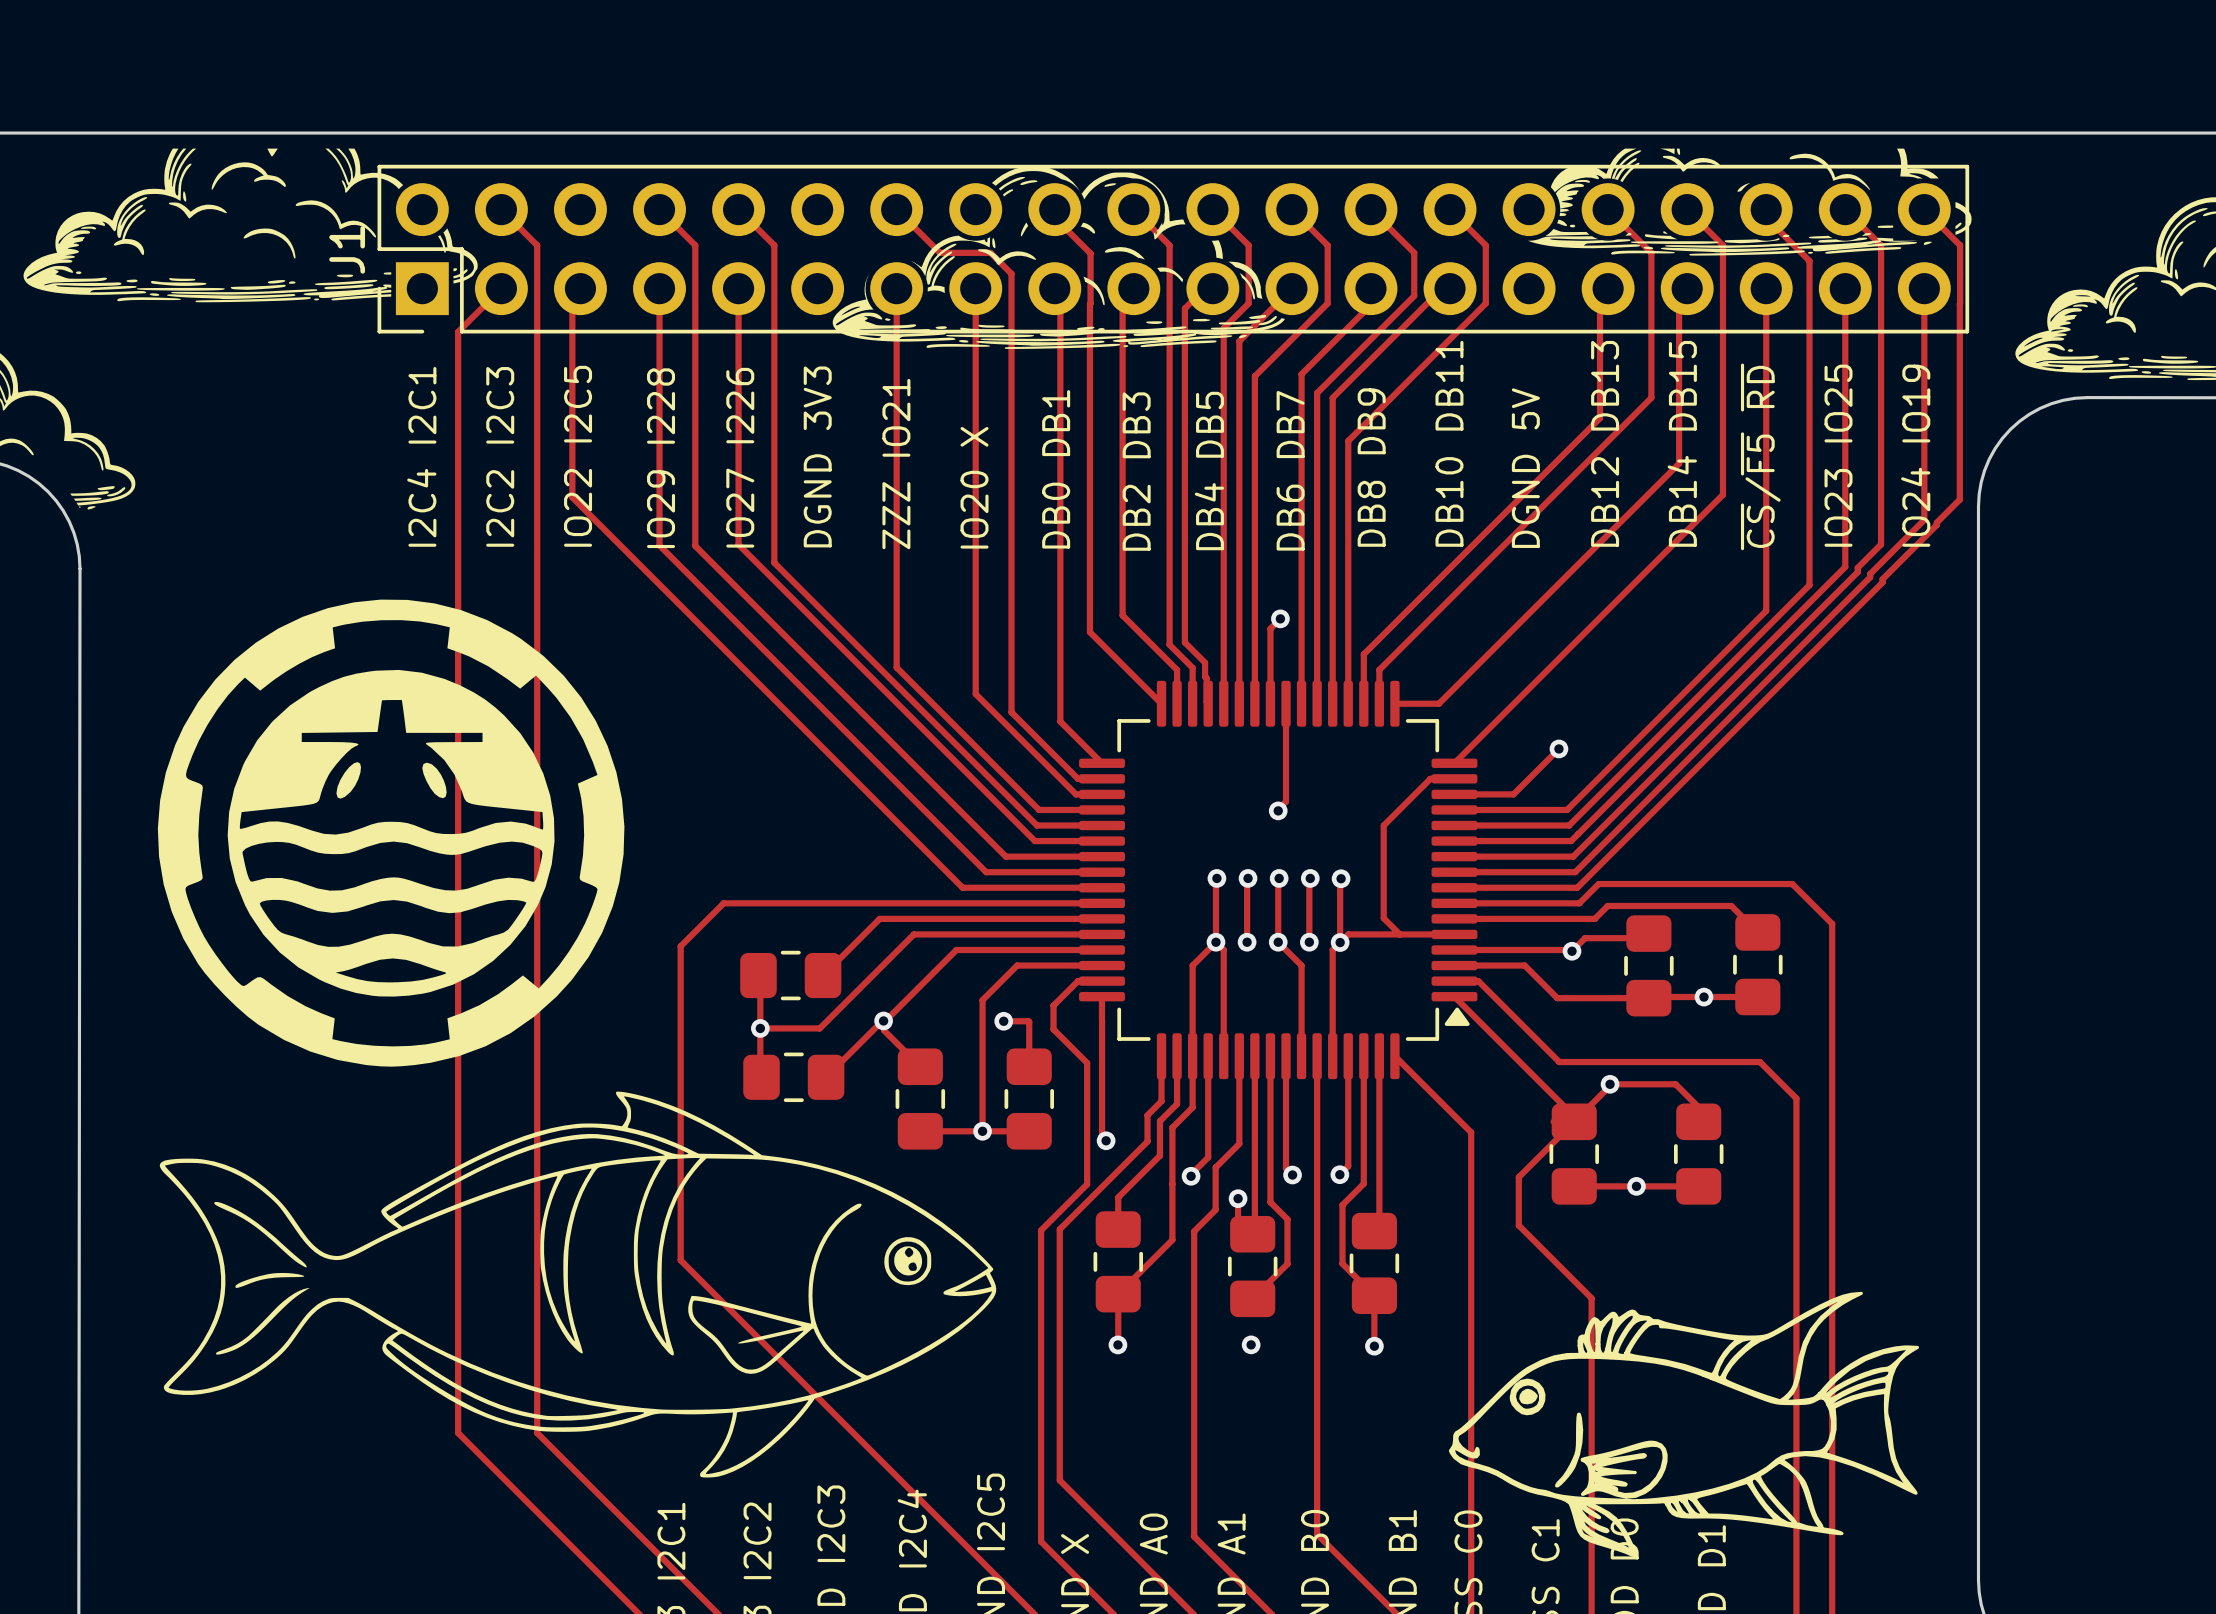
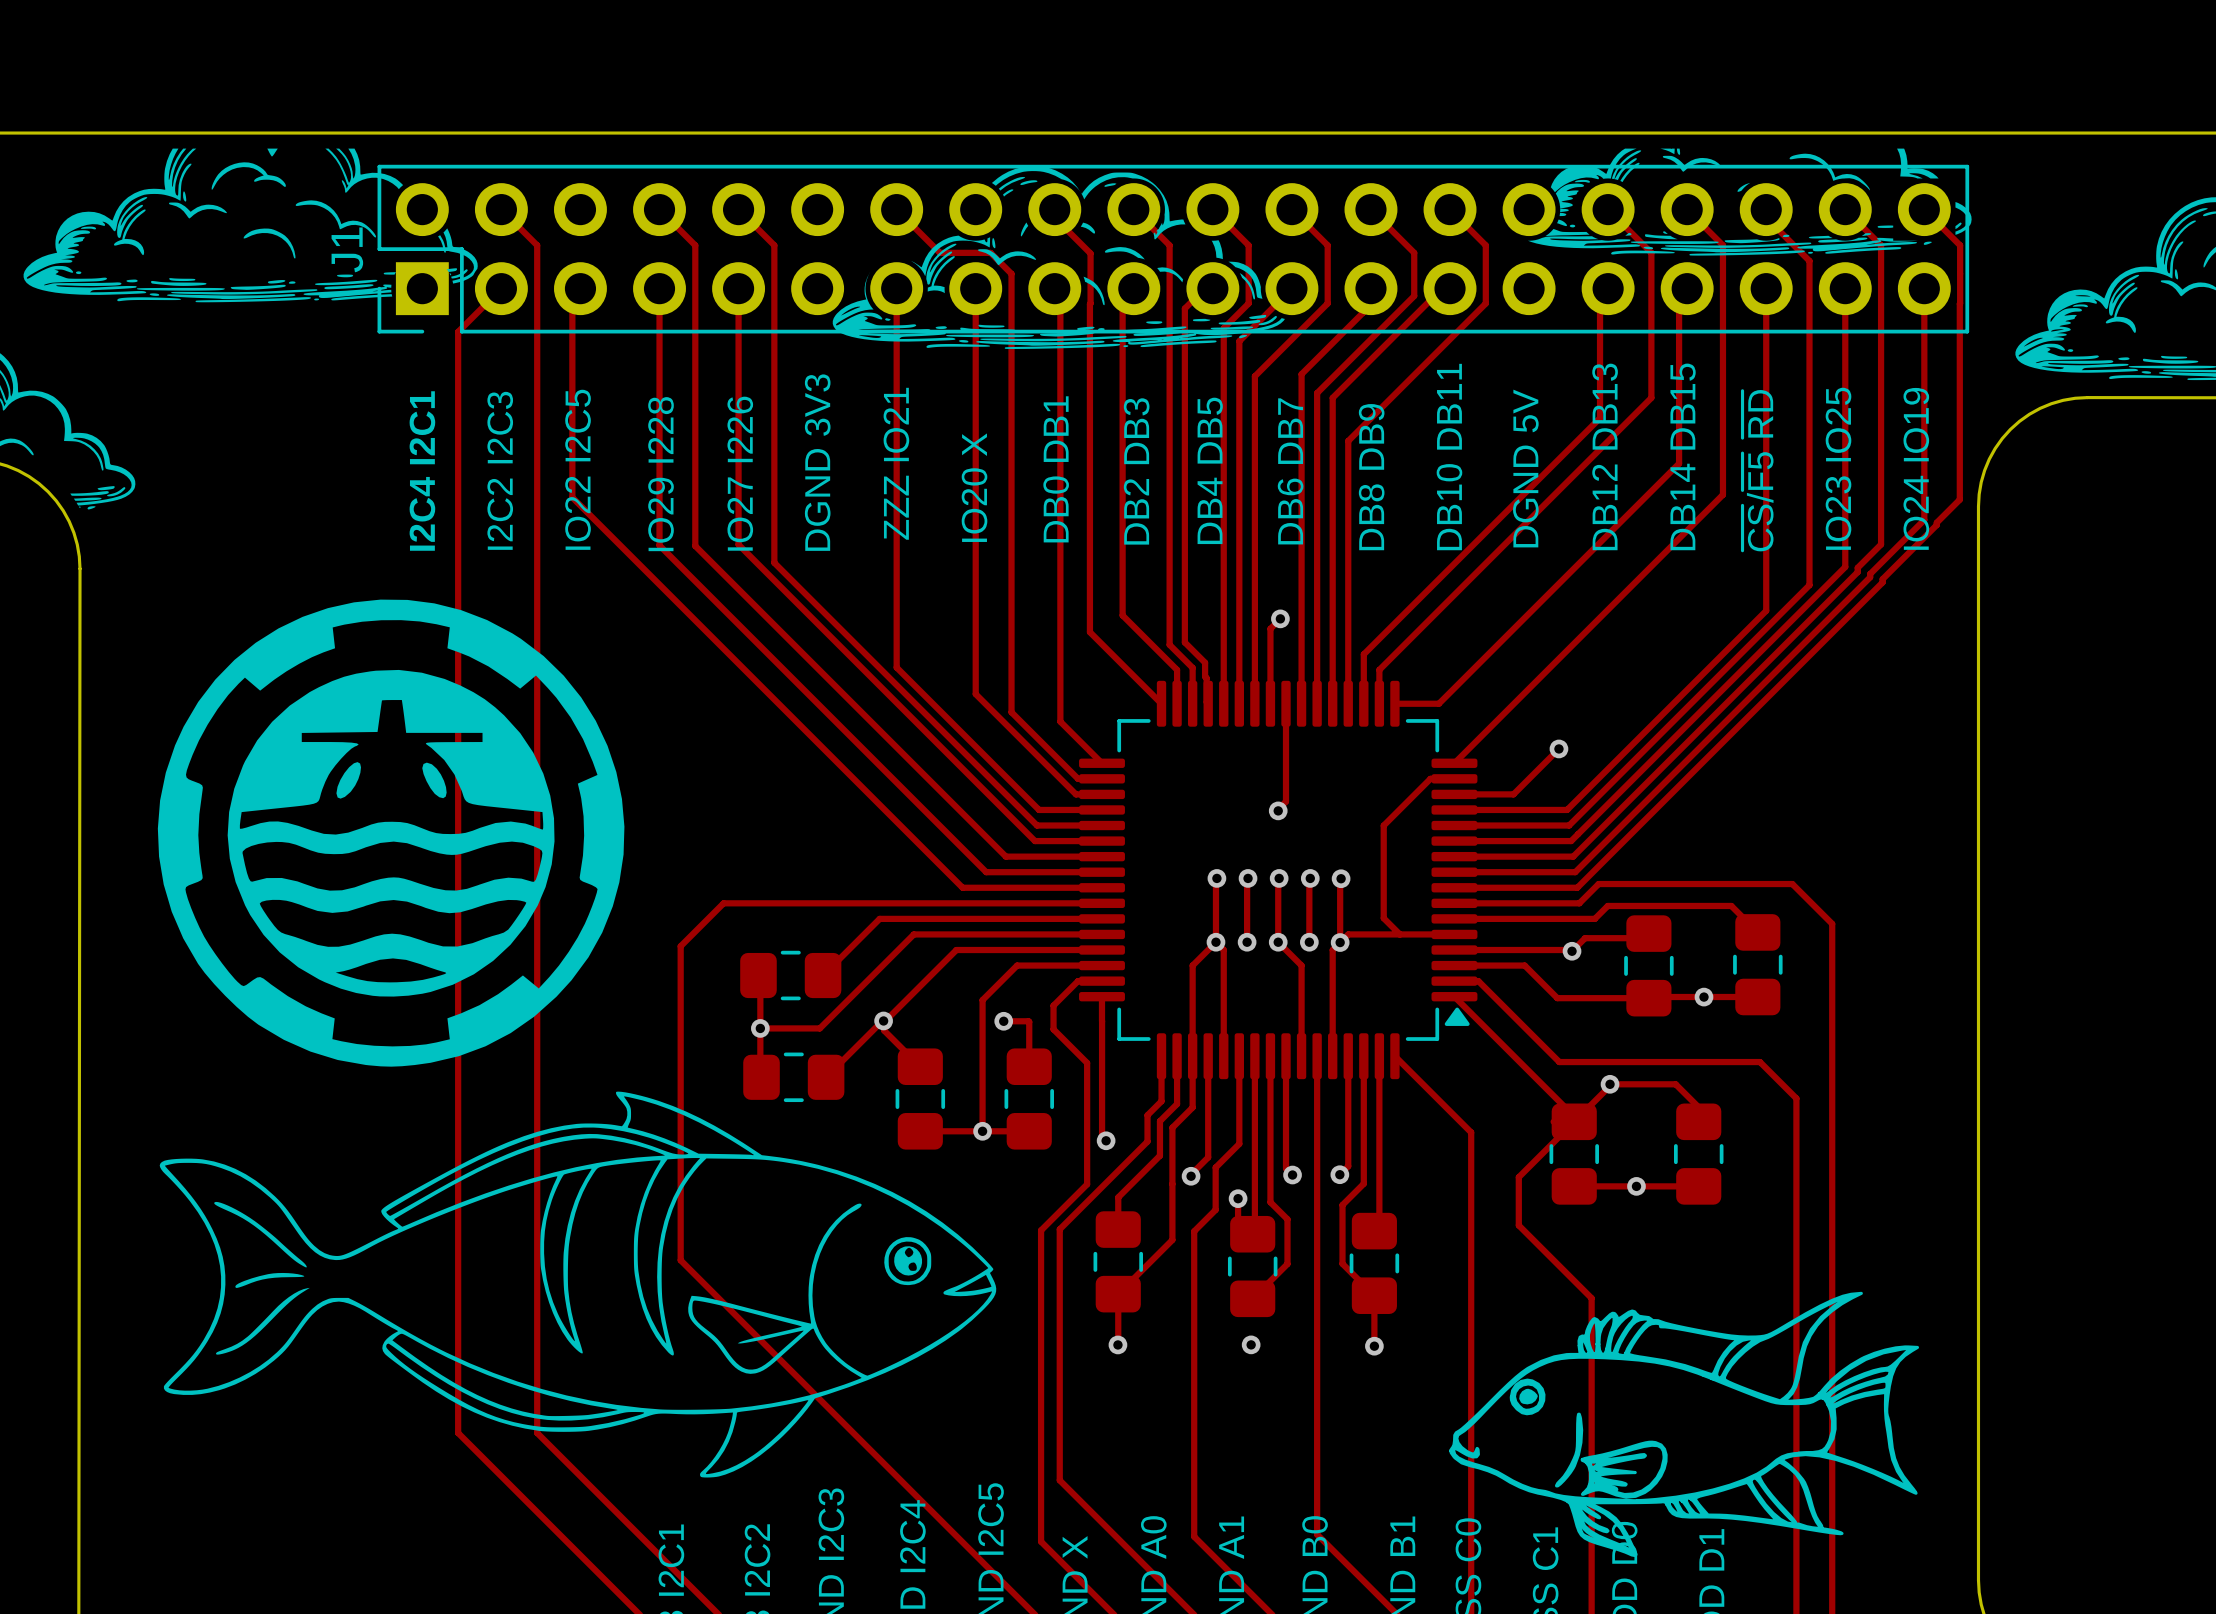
drawing shape: [23, 148, 478, 303] -> [23, 148, 478, 303]

